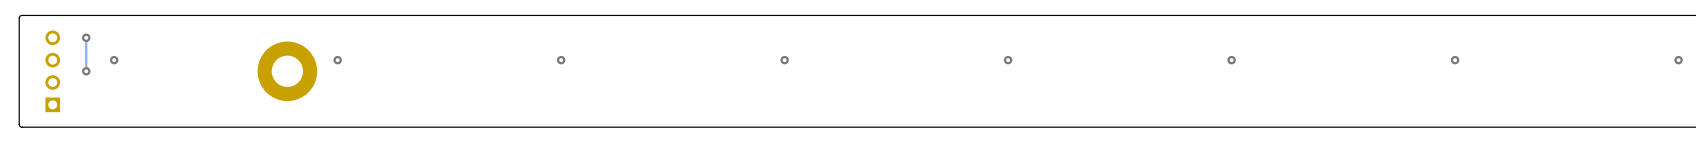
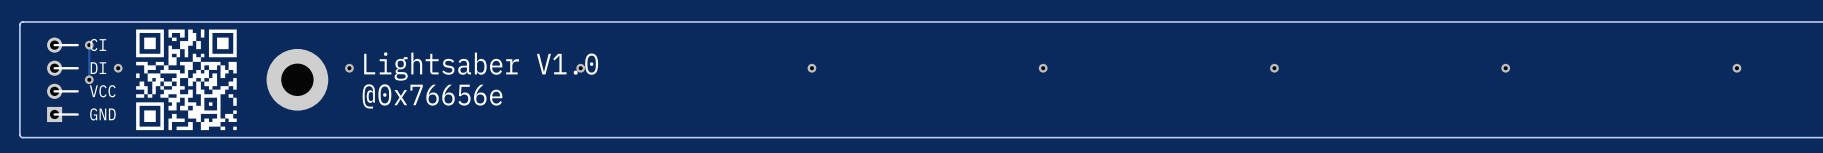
drawing: none -> [136, 29, 237, 131]
line: none -> (77, 45) (54, 45)
text: none -> CI (98, 45)
text: none -> Lightsaber V1.0 (481, 66)
line: none -> (77, 68) (54, 68)
text: none -> DI (98, 68)
line: none -> (77, 91) (54, 91)
text: none -> VCC (102, 91)
text: none -> @0x76656e (432, 96)
line: none -> (77, 114) (54, 114)
text: none -> GND (102, 114)

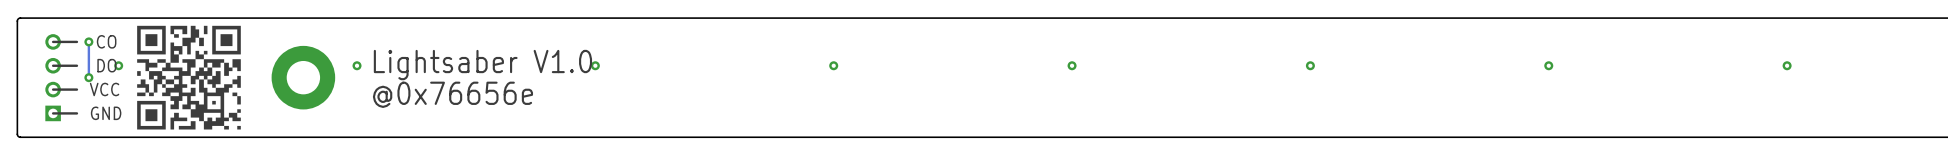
text: CI (98, 45) -> CO (106, 41)
text: DI (98, 68) -> DO (106, 65)

